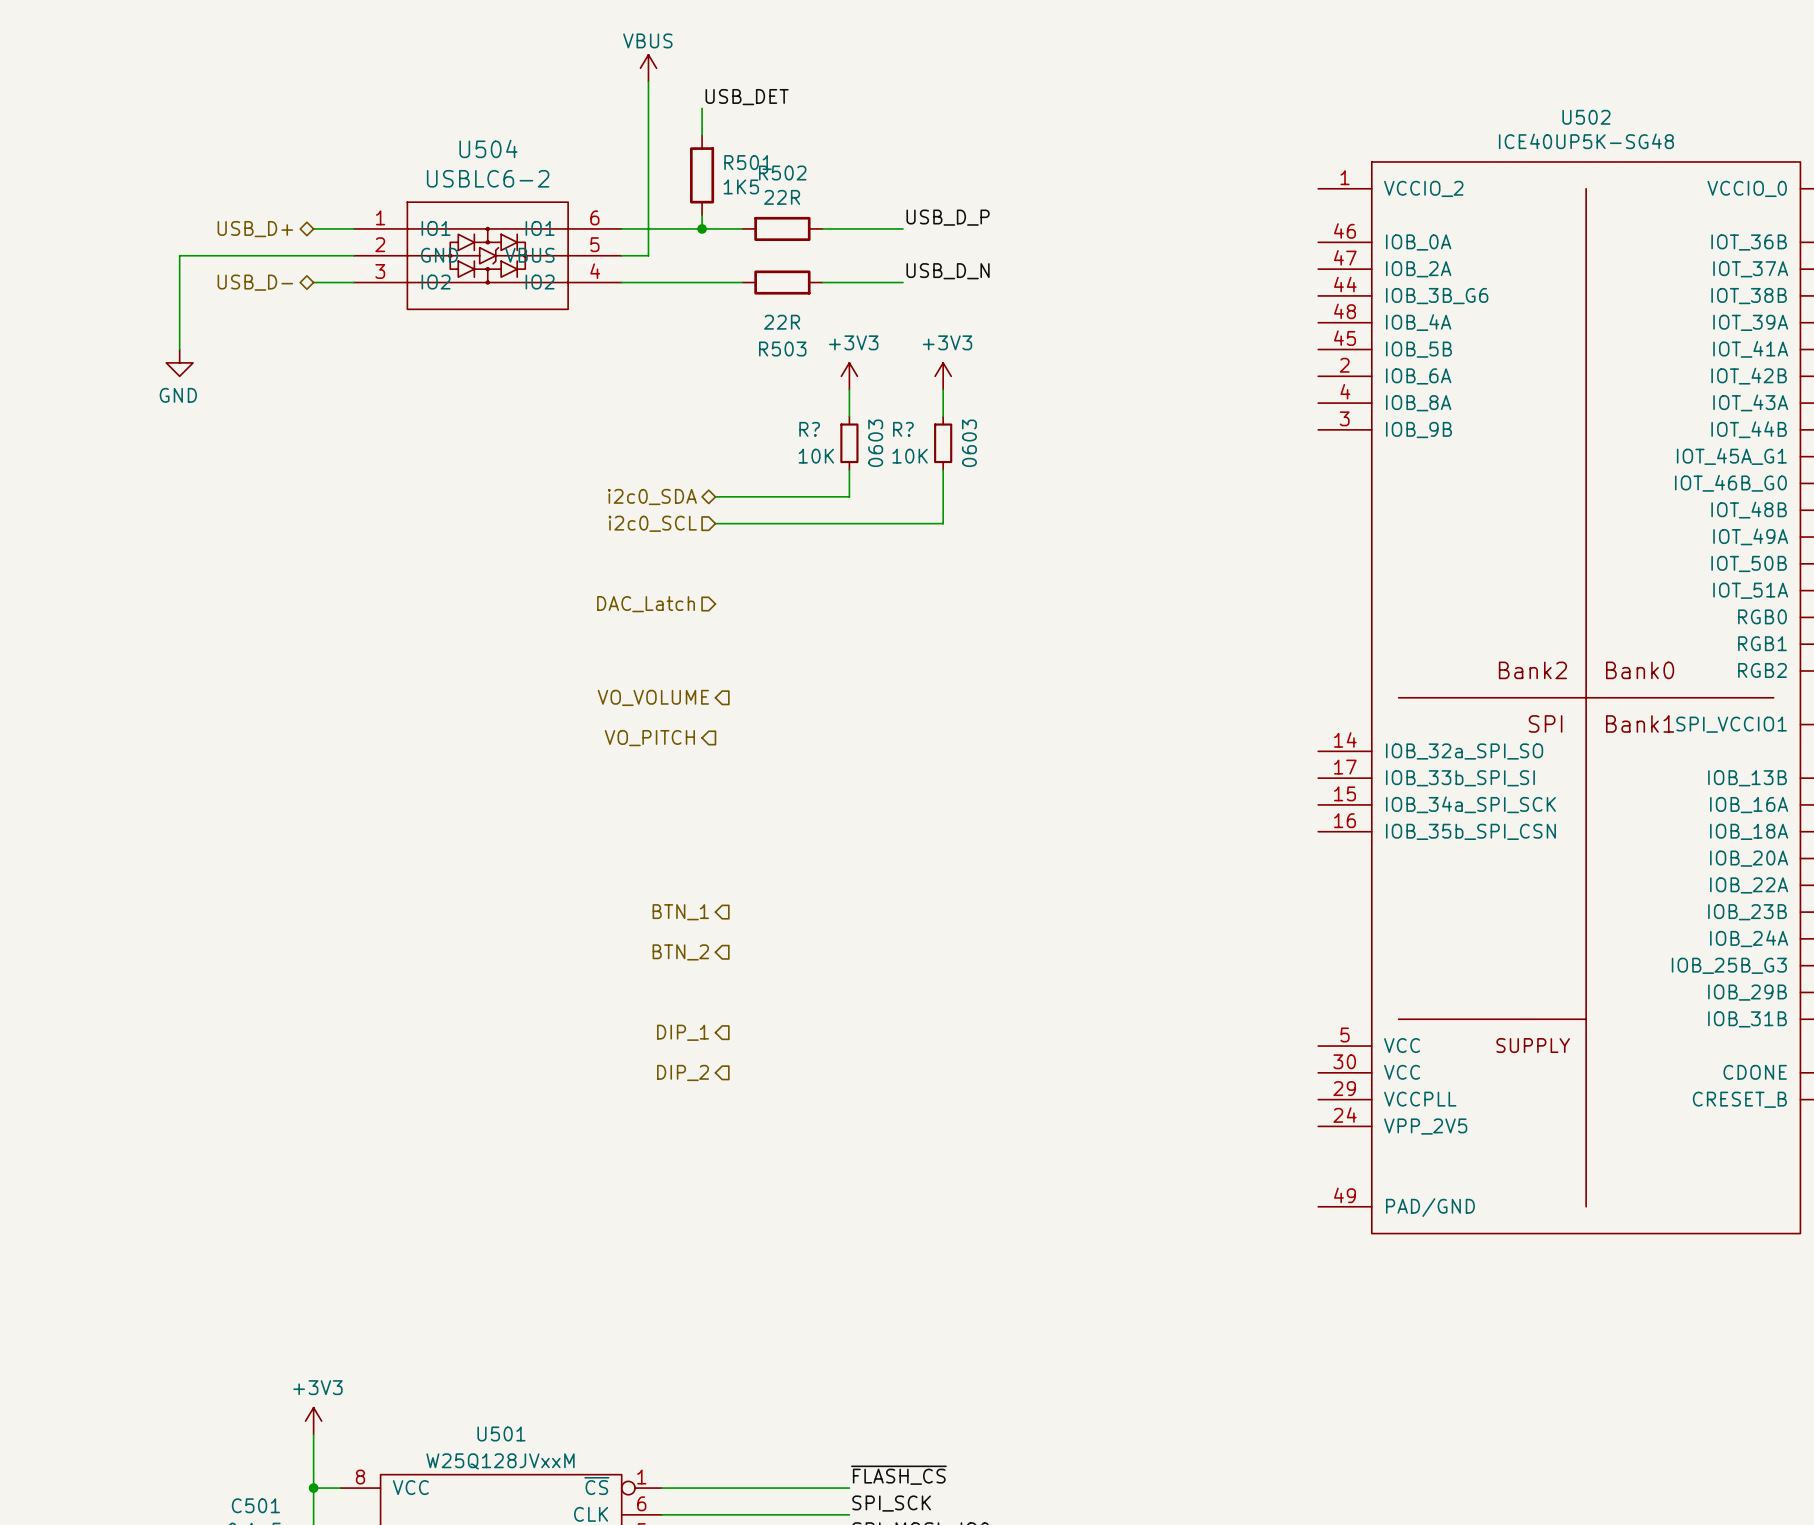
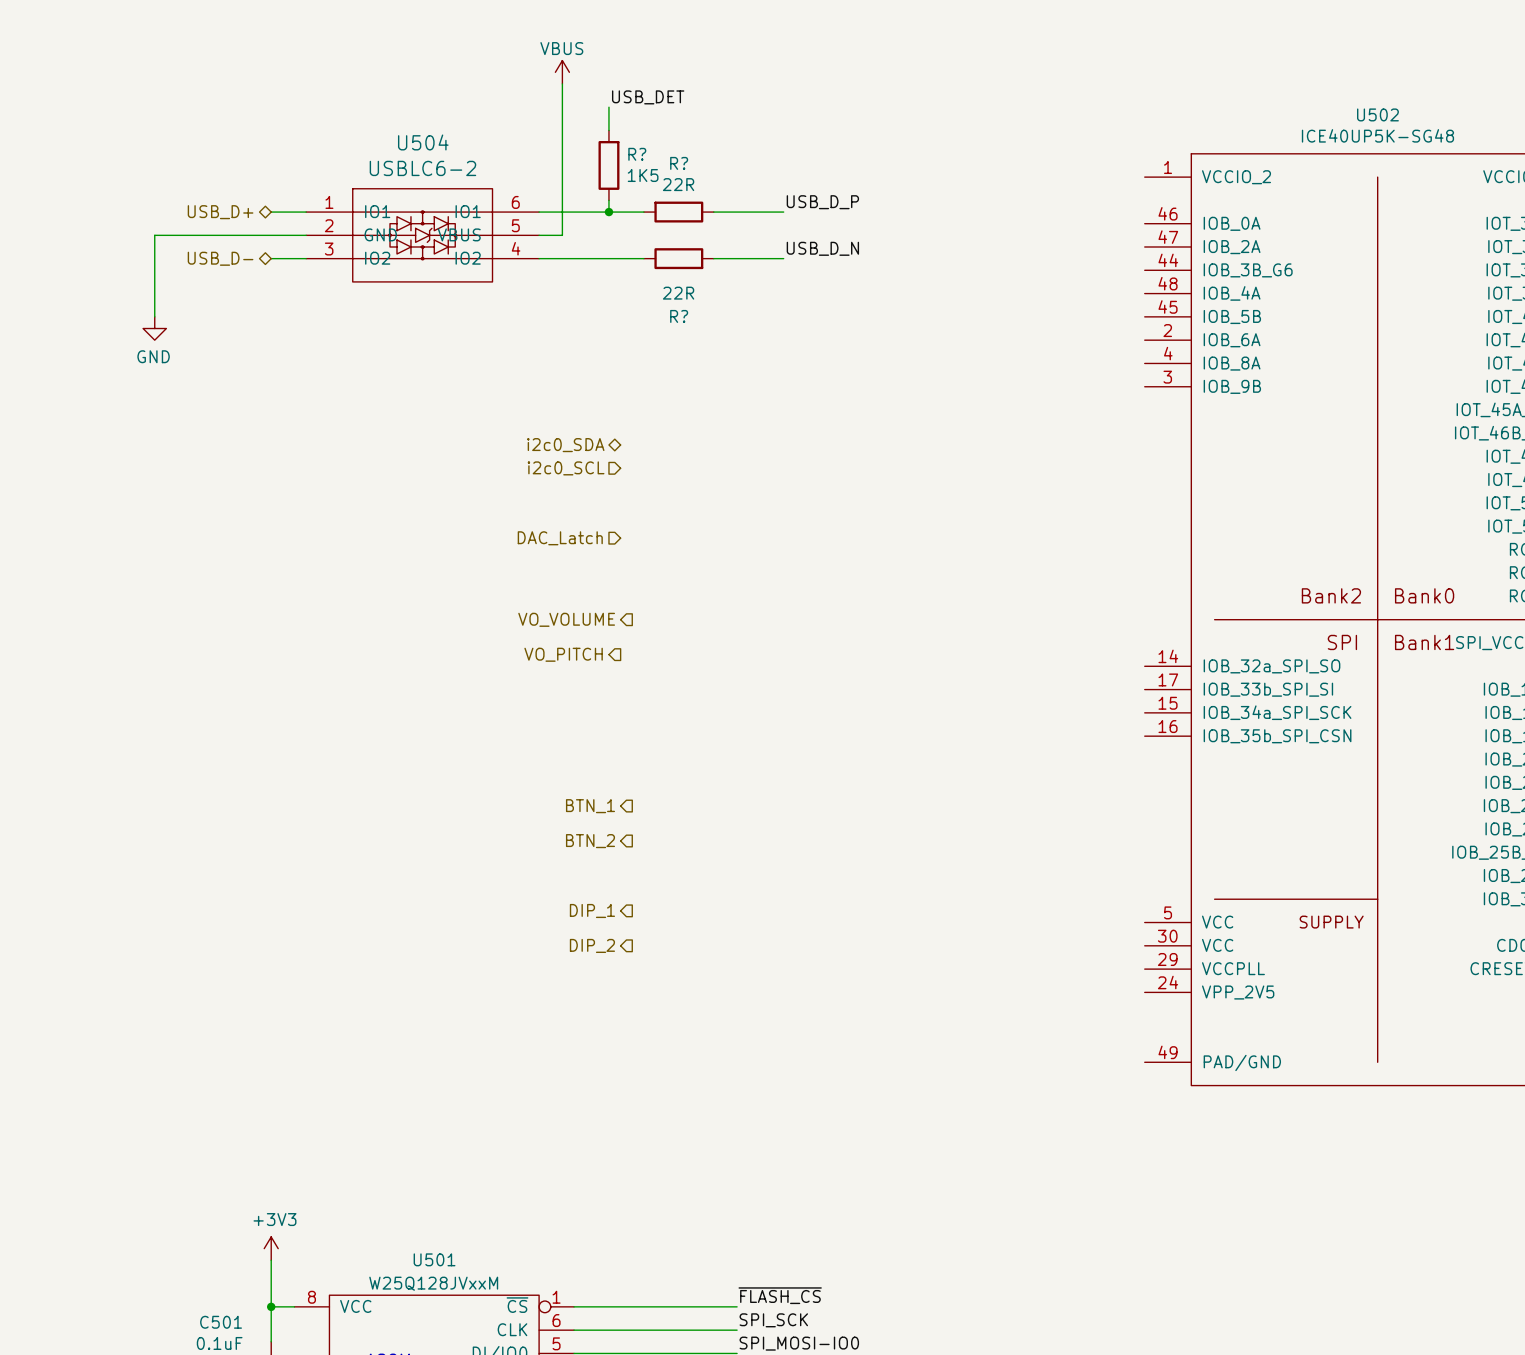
R501 name: R501 (748, 162) -> R? (637, 154)
R502 name: R502 (782, 173) -> R? (679, 163)
R503 name: R503 (782, 349) -> R? (679, 316)
power symbol: +3V3 (849, 376) -> none
power symbol: +3V3 (943, 376) -> none
wire: (849, 389) (849, 416) -> none
wire: (943, 389) (943, 416) -> none
R?: 10K (849, 443) -> none
R?: 10K (943, 443) -> none
wire: (849, 470) (849, 496) (715, 496) -> none
wire: (943, 470) (943, 523) (715, 523) -> none

